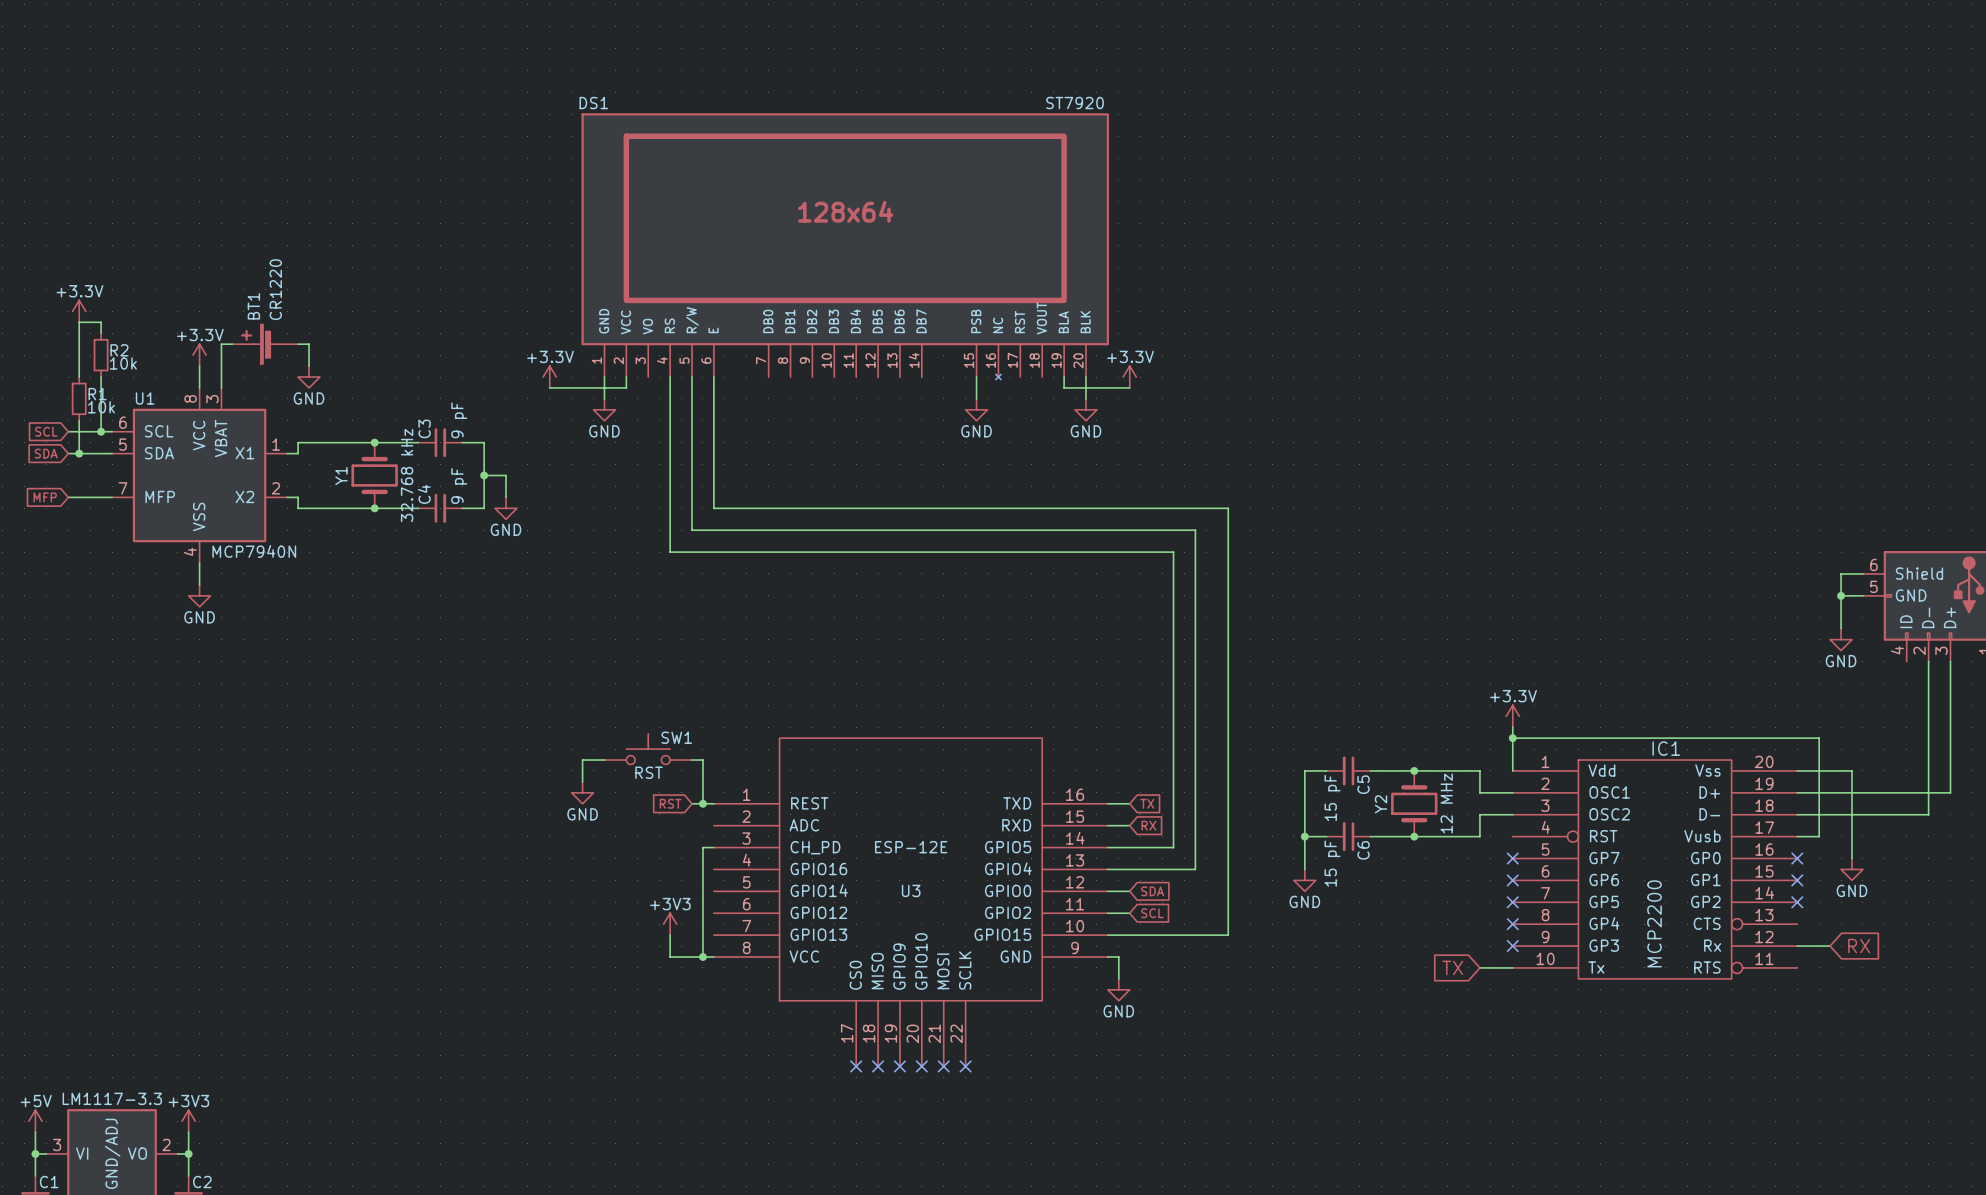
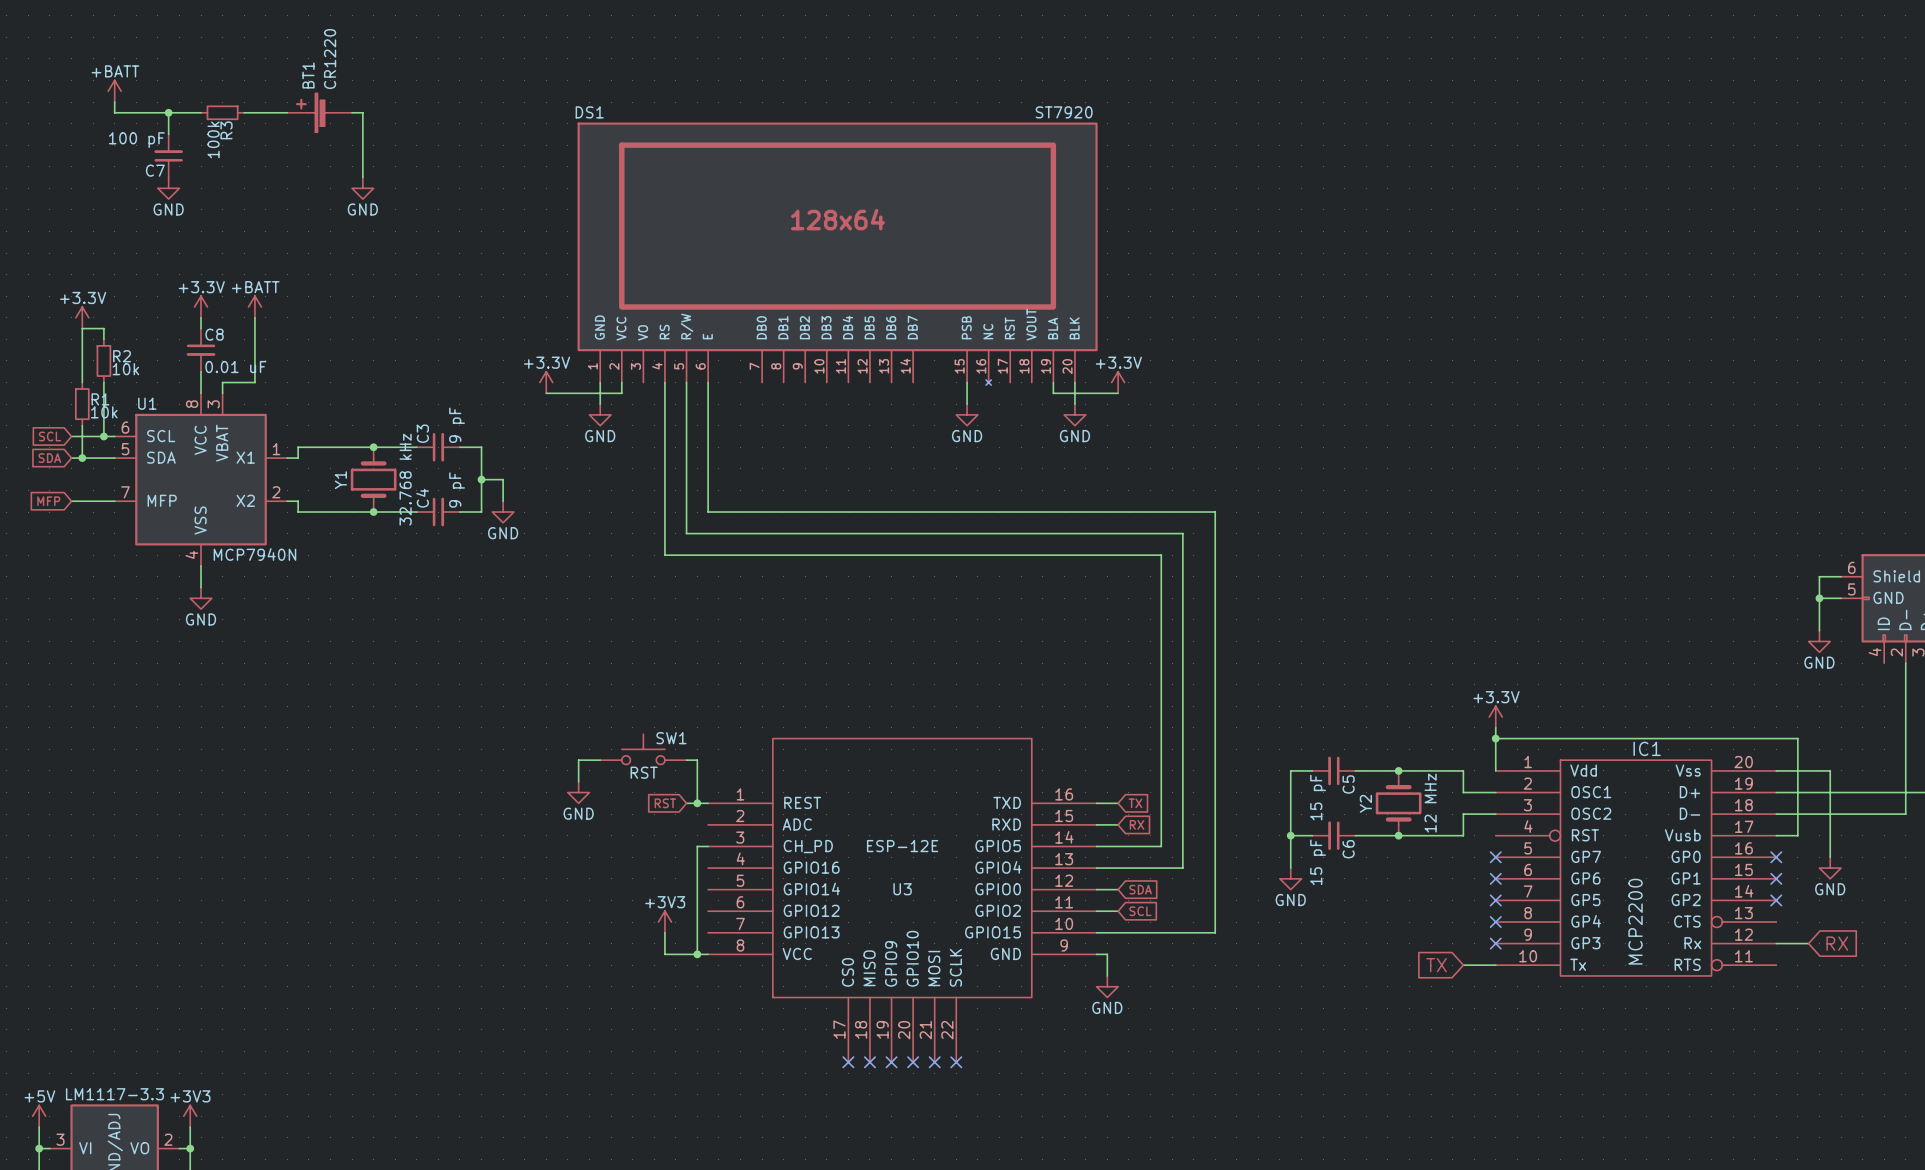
power symbol: none -> +BATT (114, 91)
wire: none -> (114, 102) (114, 112) (201, 112)
wire: none -> (168, 112) (168, 134)
junction: none -> (168, 112)
R3: none -> 100k (222, 112)
wire: none -> (244, 112) (287, 112)
wire: none -> (352, 112) (362, 112) (362, 177)
C7: none -> 100 pF (168, 155)
power symbol: none -> GND (168, 188)
power symbol: none -> GND (362, 188)
power symbol: none -> +BATT (254, 307)
wire: none -> (201, 317) (201, 328)
C8: none -> 0.01 uF (201, 350)
wire: (232, 344) (221, 344) (221, 377) -> (254, 317) (254, 382) (222, 382)
BT1 position: (265, 344) -> (319, 112)
wire: (298, 344) (309, 344) (309, 366) -> none
power symbol position: +3.3V (199, 355) -> +3.3V (201, 307)
power symbol: GND (309, 377) -> none

